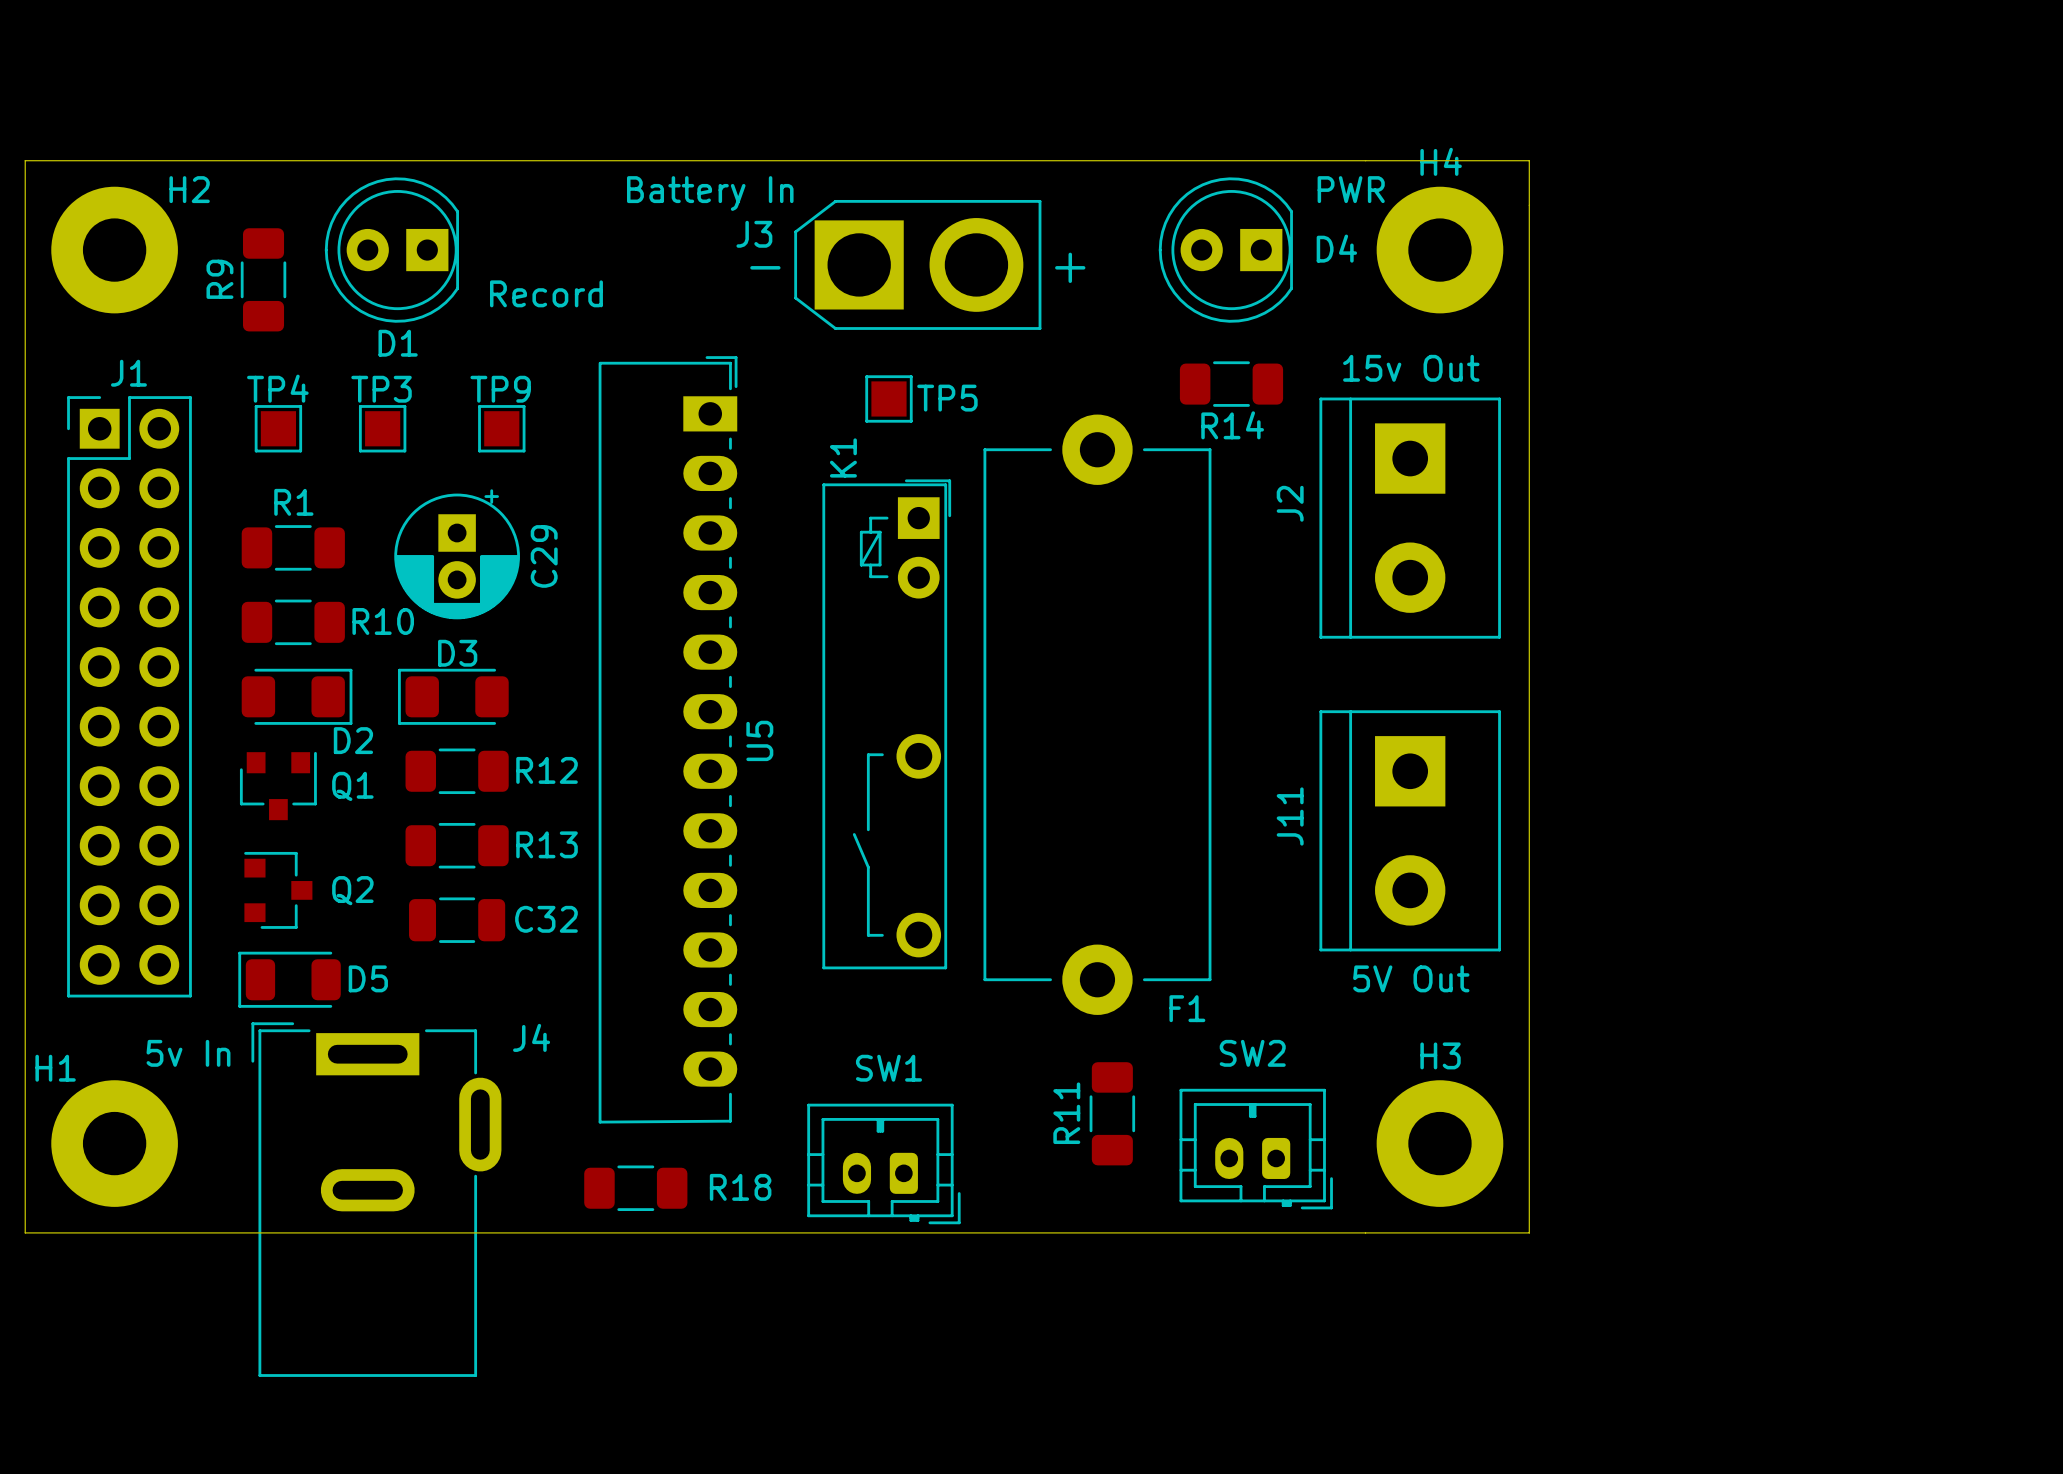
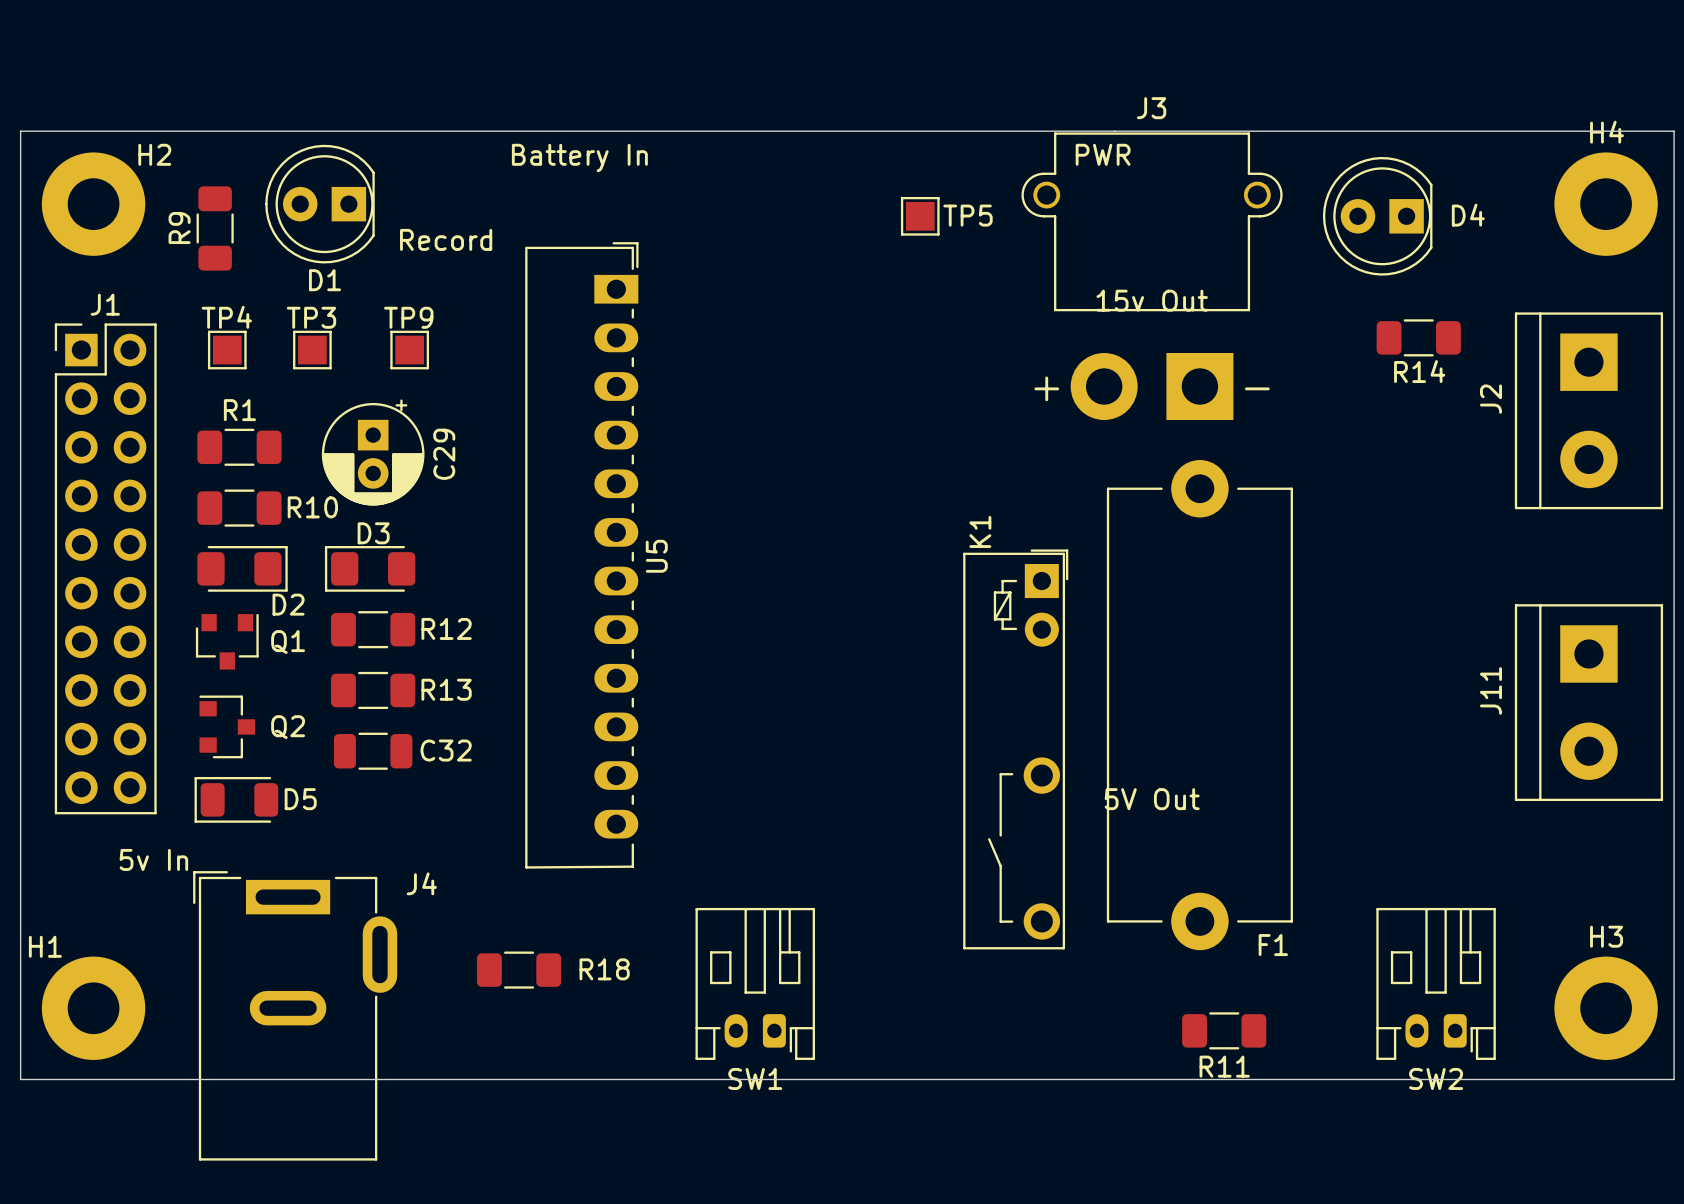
board edge: (1529, 160) (1529, 1232) (25, 1232) -> (1248, 131) (1674, 131) (1674, 1079) (20, 1079) (20, 1006)
D4 footprint: [1158, 177, 1293, 323] -> [1322, 156, 1433, 276]
J3 footprint: [794, 199, 1042, 330] -> [1021, 132, 1283, 421]
J3 name position: J3 (754, 234) -> J3 (1151, 108)
H4 position: (1439, 250) -> (1606, 204)
R14 position: (1231, 384) -> (1418, 337)
TP5 position: (888, 398) -> (920, 216)
J2 position: (1410, 518) -> (1588, 410)
F1 position: (1097, 714) -> (1199, 705)
K1 position: (886, 724) -> (1015, 749)
U5 position: (668, 739) -> (581, 555)
J11 position: (1410, 830) -> (1588, 702)
SW2 name position: SW2 (1252, 1053) -> SW2 (1436, 1078)
SW1 name position: SW1 (888, 1068) -> SW1 (755, 1078)
SW2 footprint: [1179, 1088, 1333, 1210] -> [1376, 907, 1496, 1060]
SW1 footprint: [807, 1103, 961, 1225] -> [695, 907, 815, 1060]
R11 name position: R11 (1066, 1113) -> R11 (1224, 1066)
R11 rotation: 0° (1112, 1113) -> 90° clockwise (1224, 1030)
R11 position: (1112, 1113) -> (1224, 1030)
H1 position: (114, 1143) -> (93, 1008)
H3 position: (1439, 1143) -> (1606, 1008)
J4 position: (376, 1199) -> (295, 1015)

